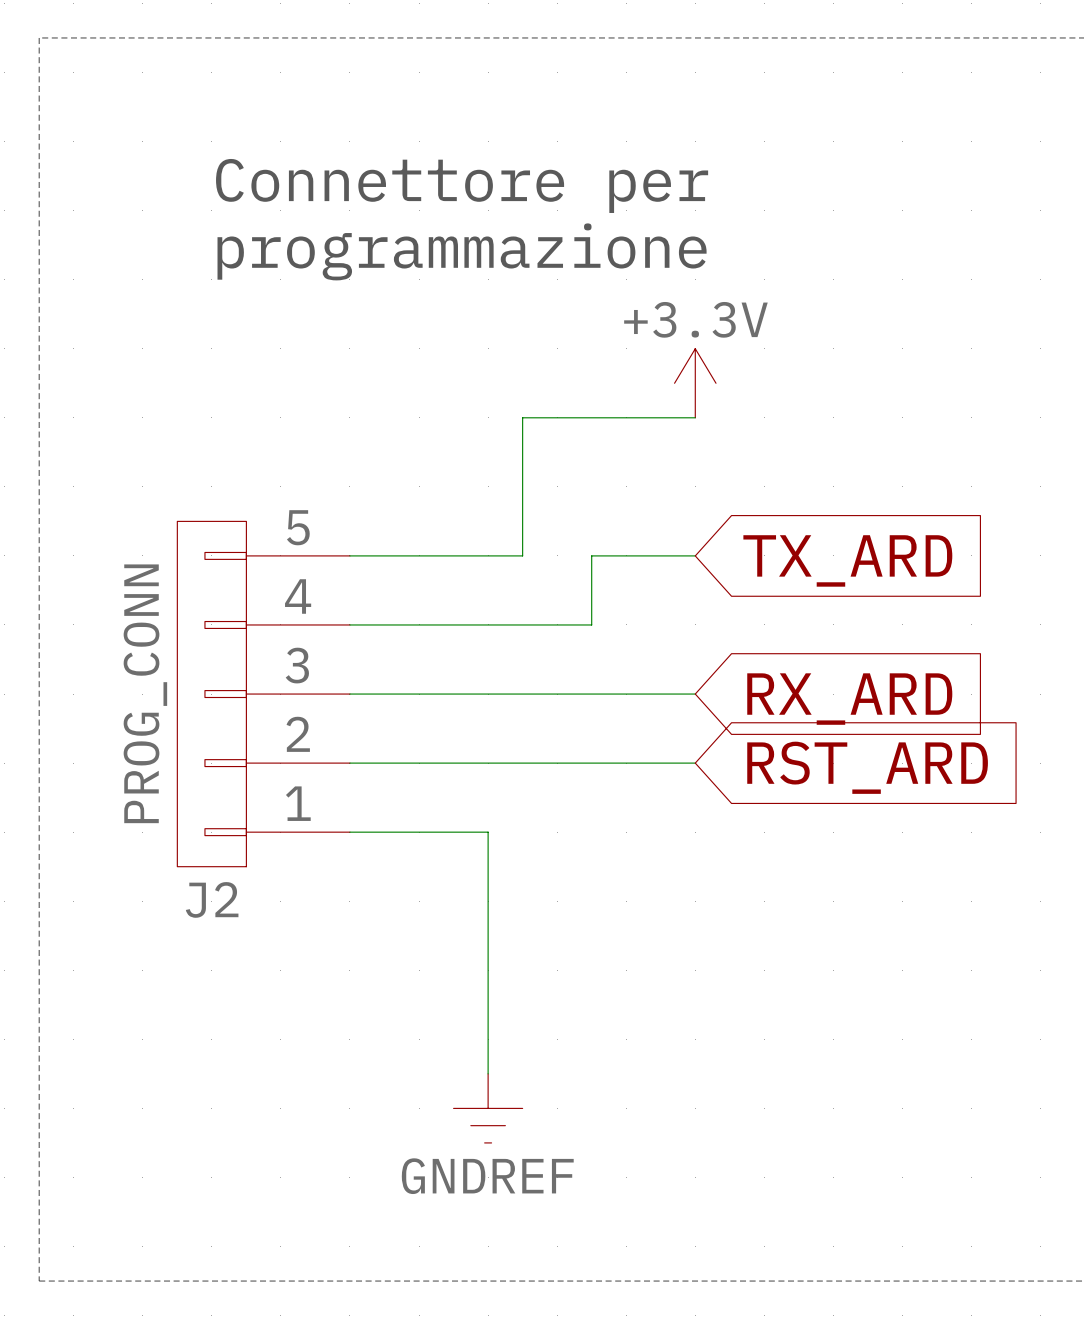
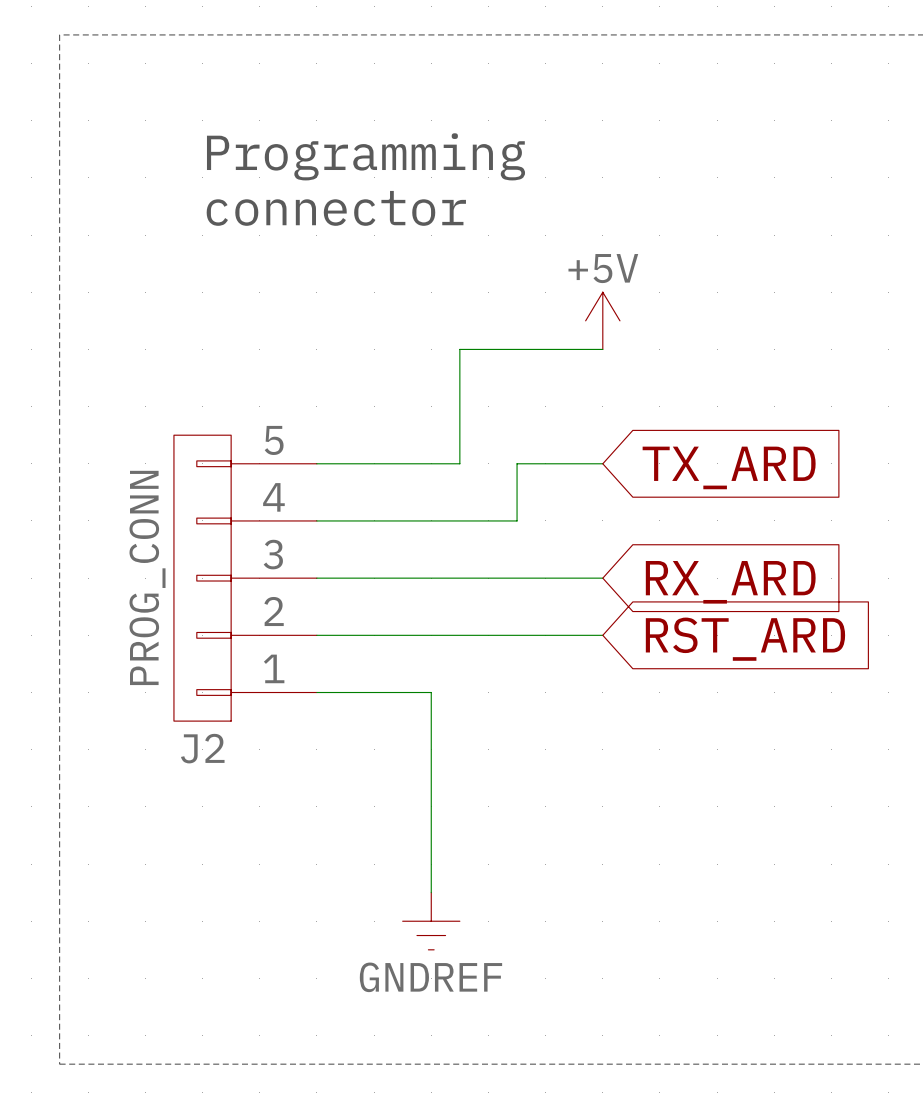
text: Connettore per (462, 185) -> Programming (366, 156)
text: programmazione (462, 251) -> connector (336, 208)
power symbol: +3.3V (695, 383) -> +5V (602, 320)

